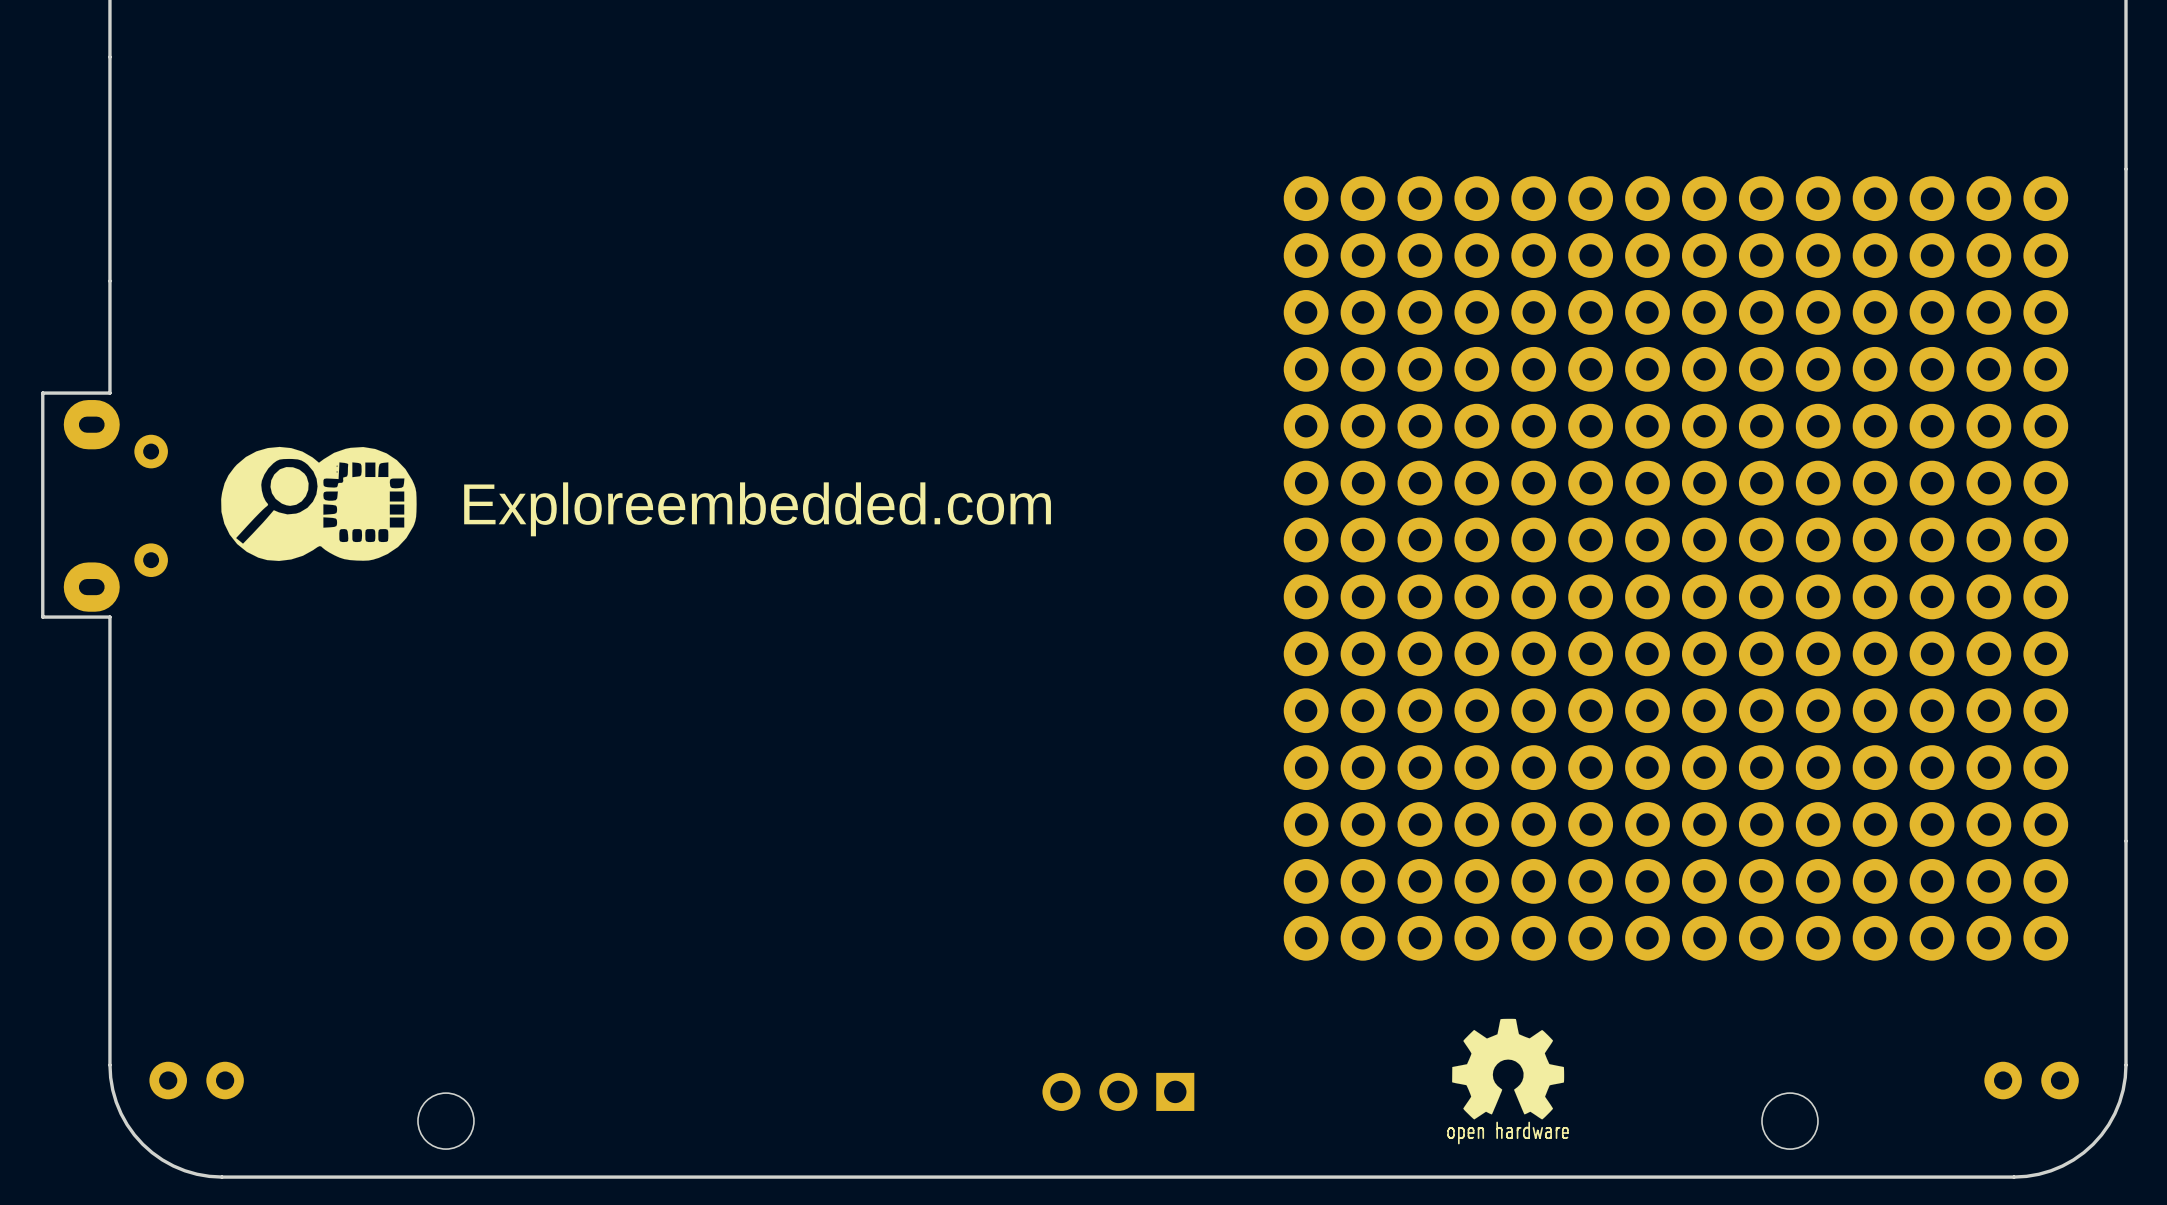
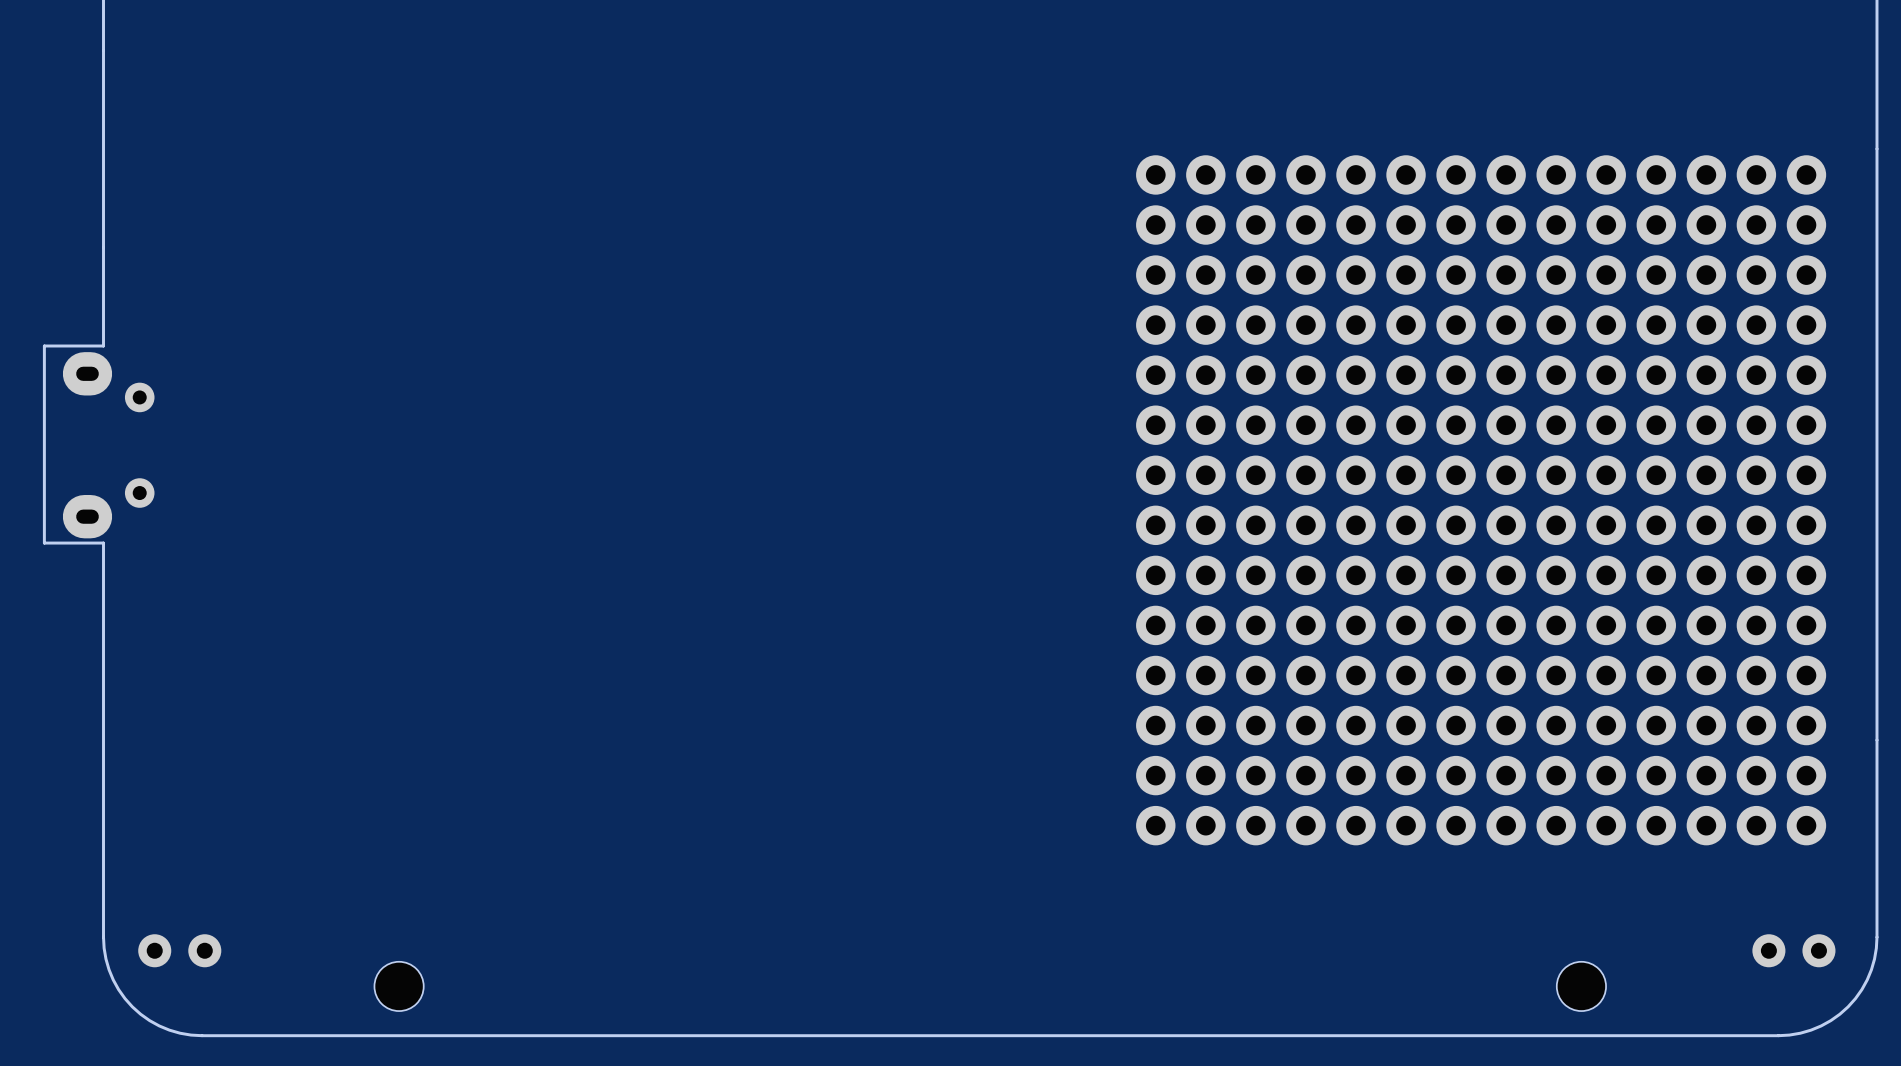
drawing: [221, 446, 417, 561] -> none
text: Exploreembedded.com (757, 509) -> none
drawing: [1447, 1018, 1569, 1145] -> none
part: (1118, 1091) -> none

